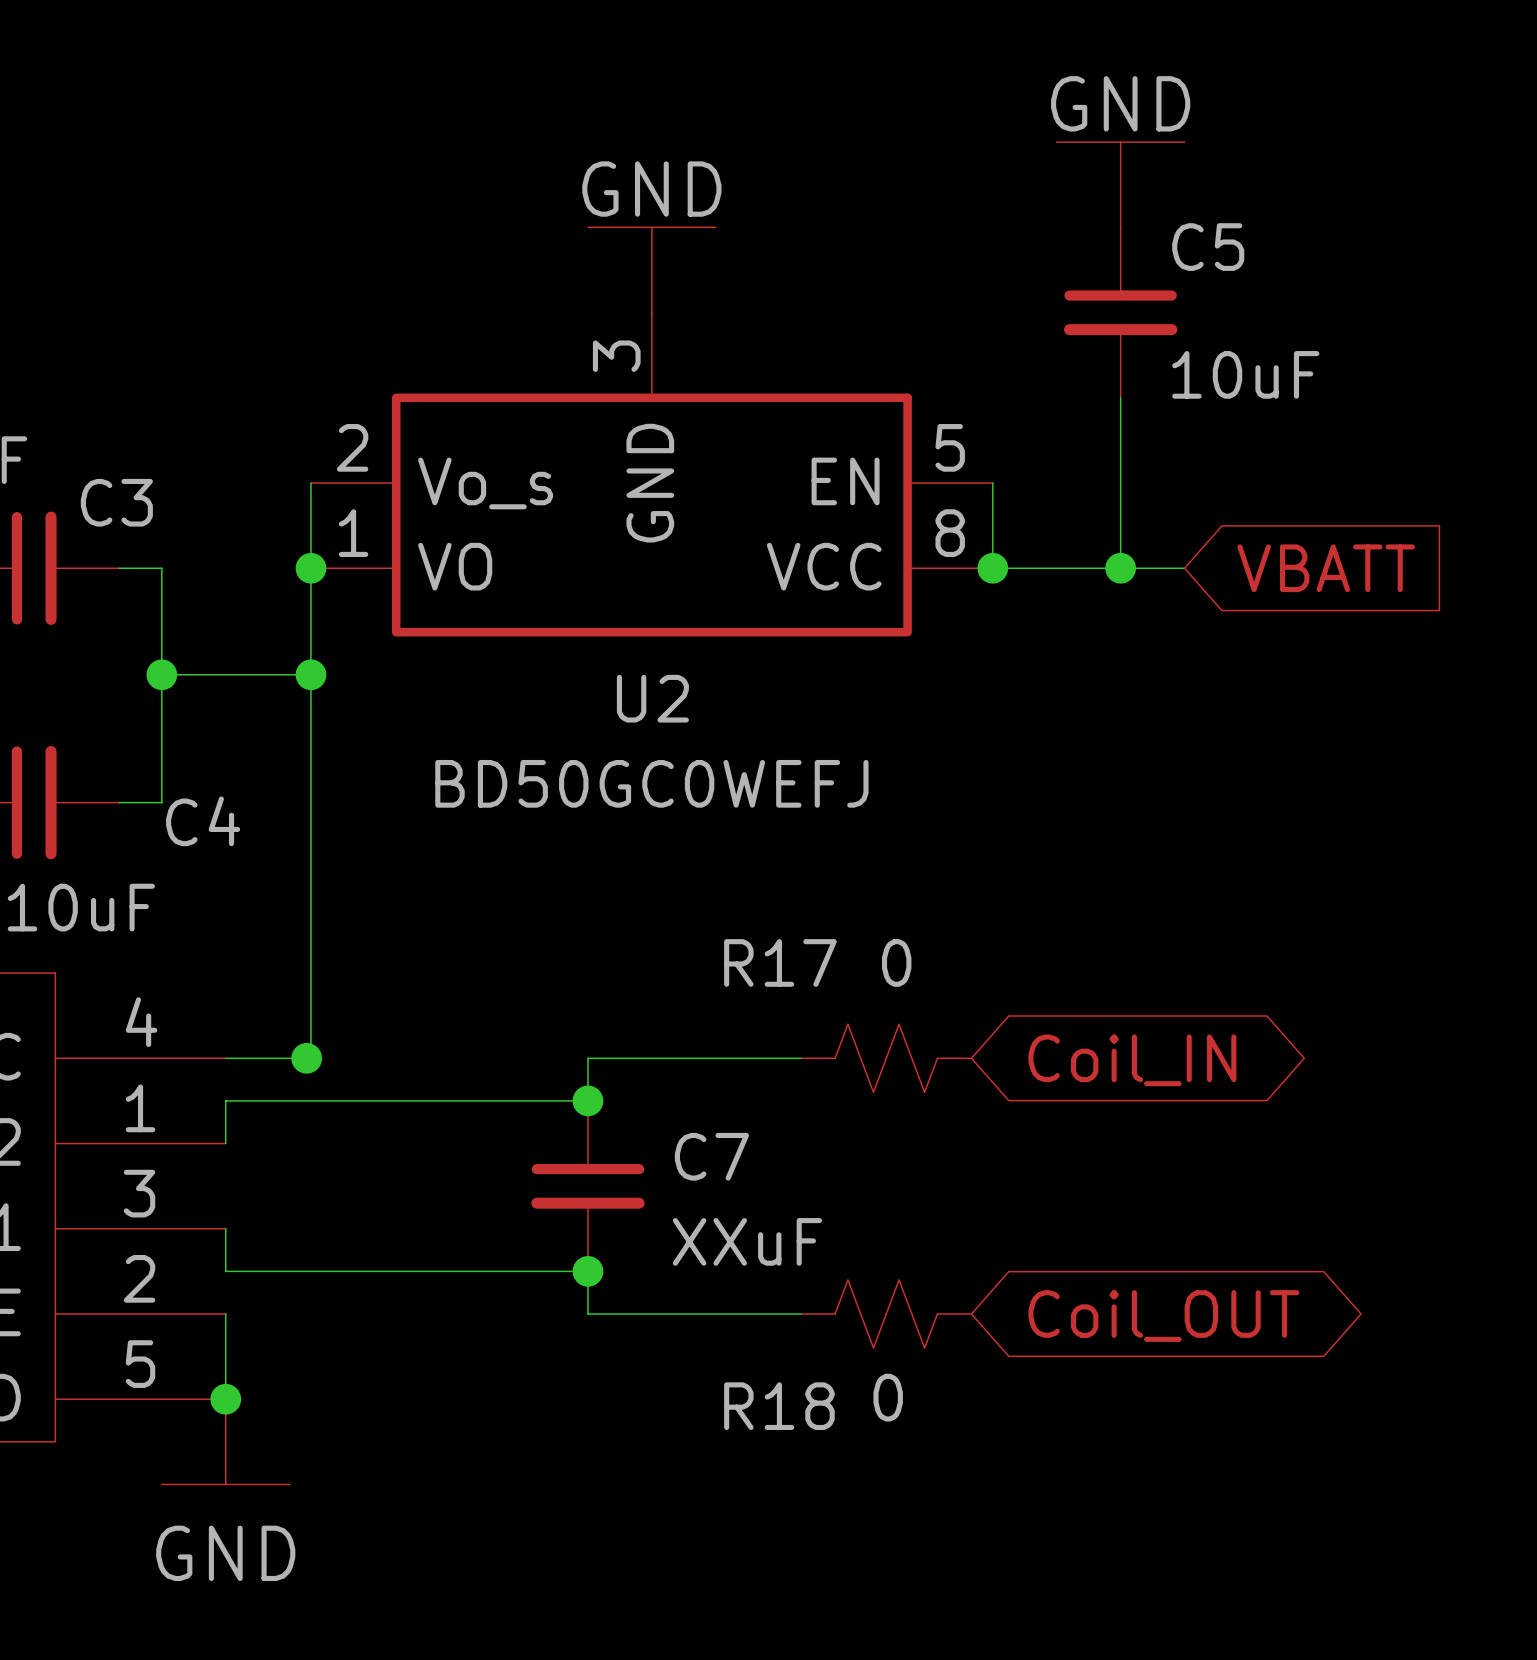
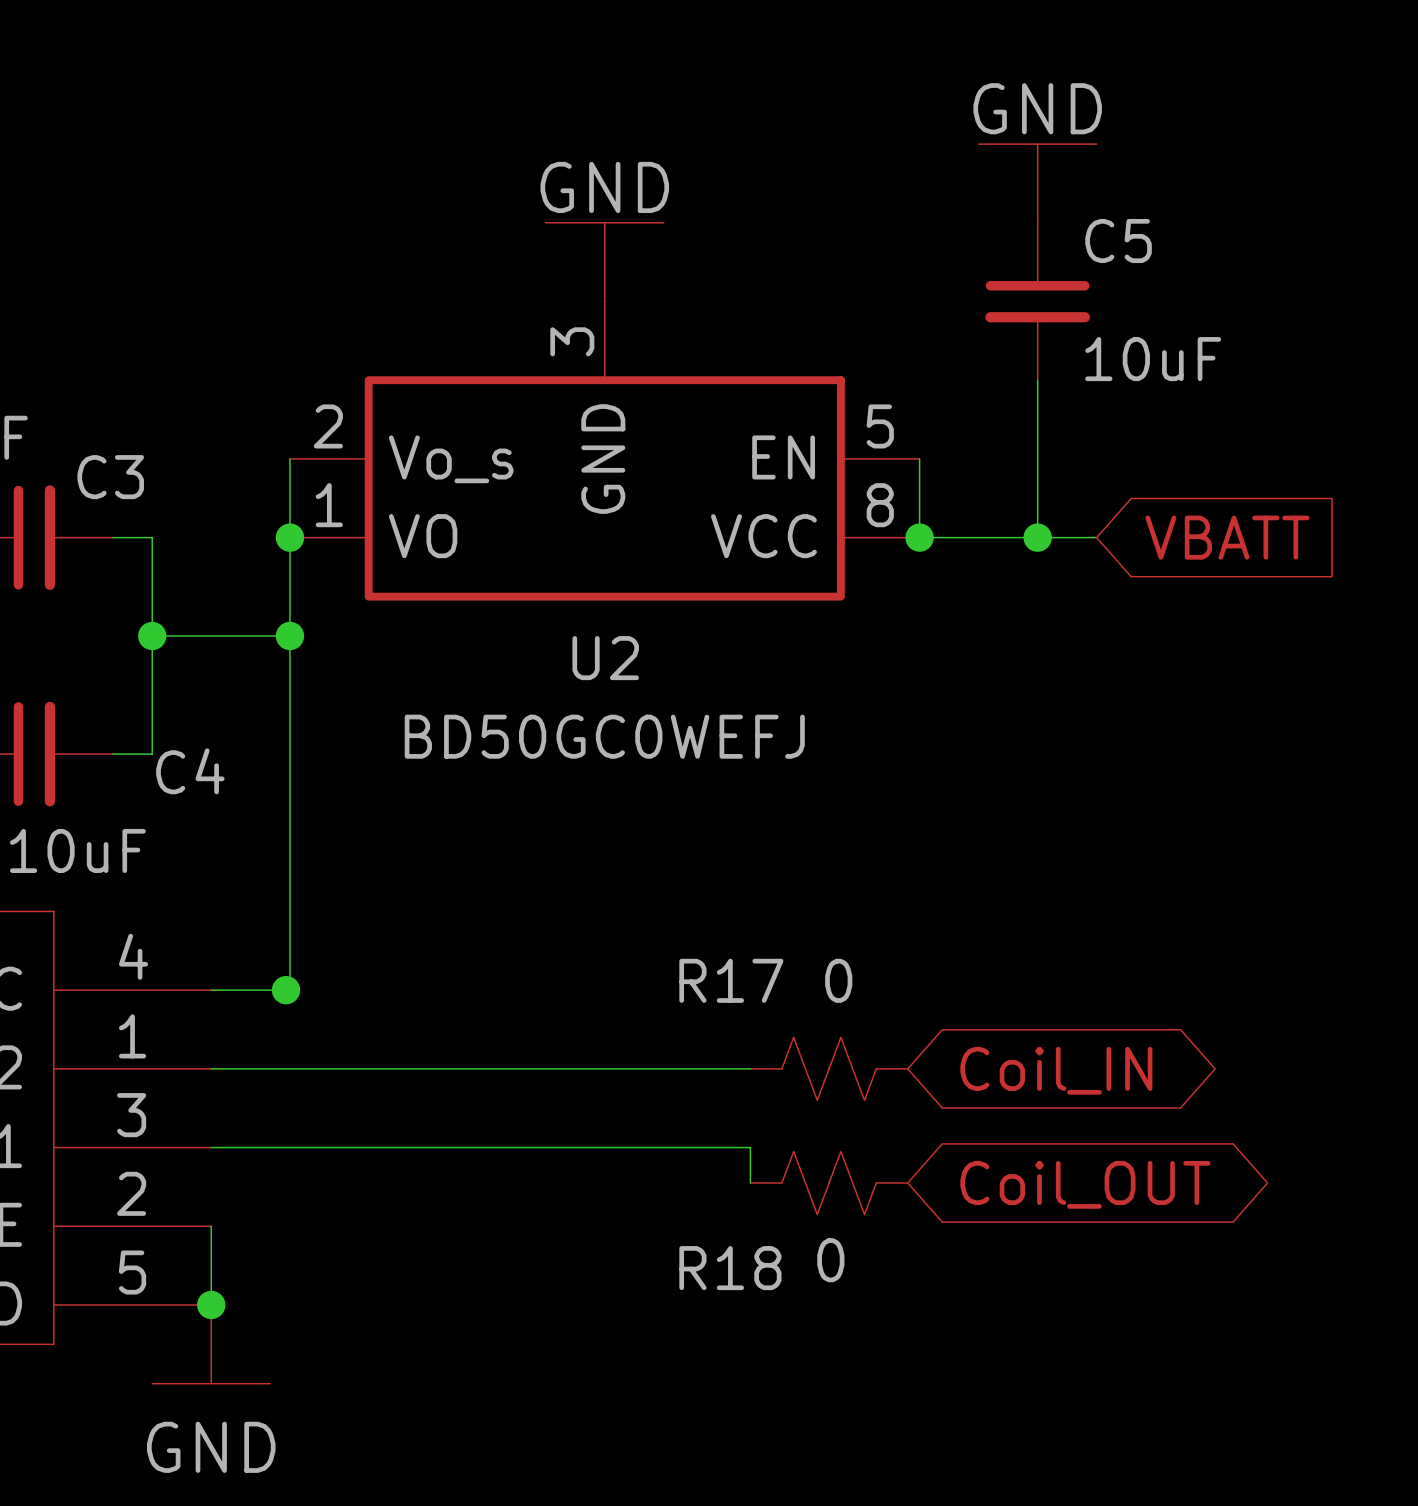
wire: (801, 1058) (587, 1058) (587, 1100) (225, 1100) (225, 1143) -> (750, 1068) (211, 1068)
R17 position: (886, 1058) -> (829, 1068)
global label position: Coil_IN (1132, 1060) -> Coil_IN (1056, 1070)
junction: (587, 1100) -> none
C7: XXuF (587, 1186) -> none
wire: (225, 1228) (225, 1271) (587, 1271) (587, 1314) (801, 1314) -> (211, 1147) (750, 1147) (750, 1182)
junction: (587, 1271) -> none
R18 position: (886, 1314) -> (829, 1182)
global label position: Coil_OUT (1163, 1316) -> Coil_OUT (1085, 1184)

